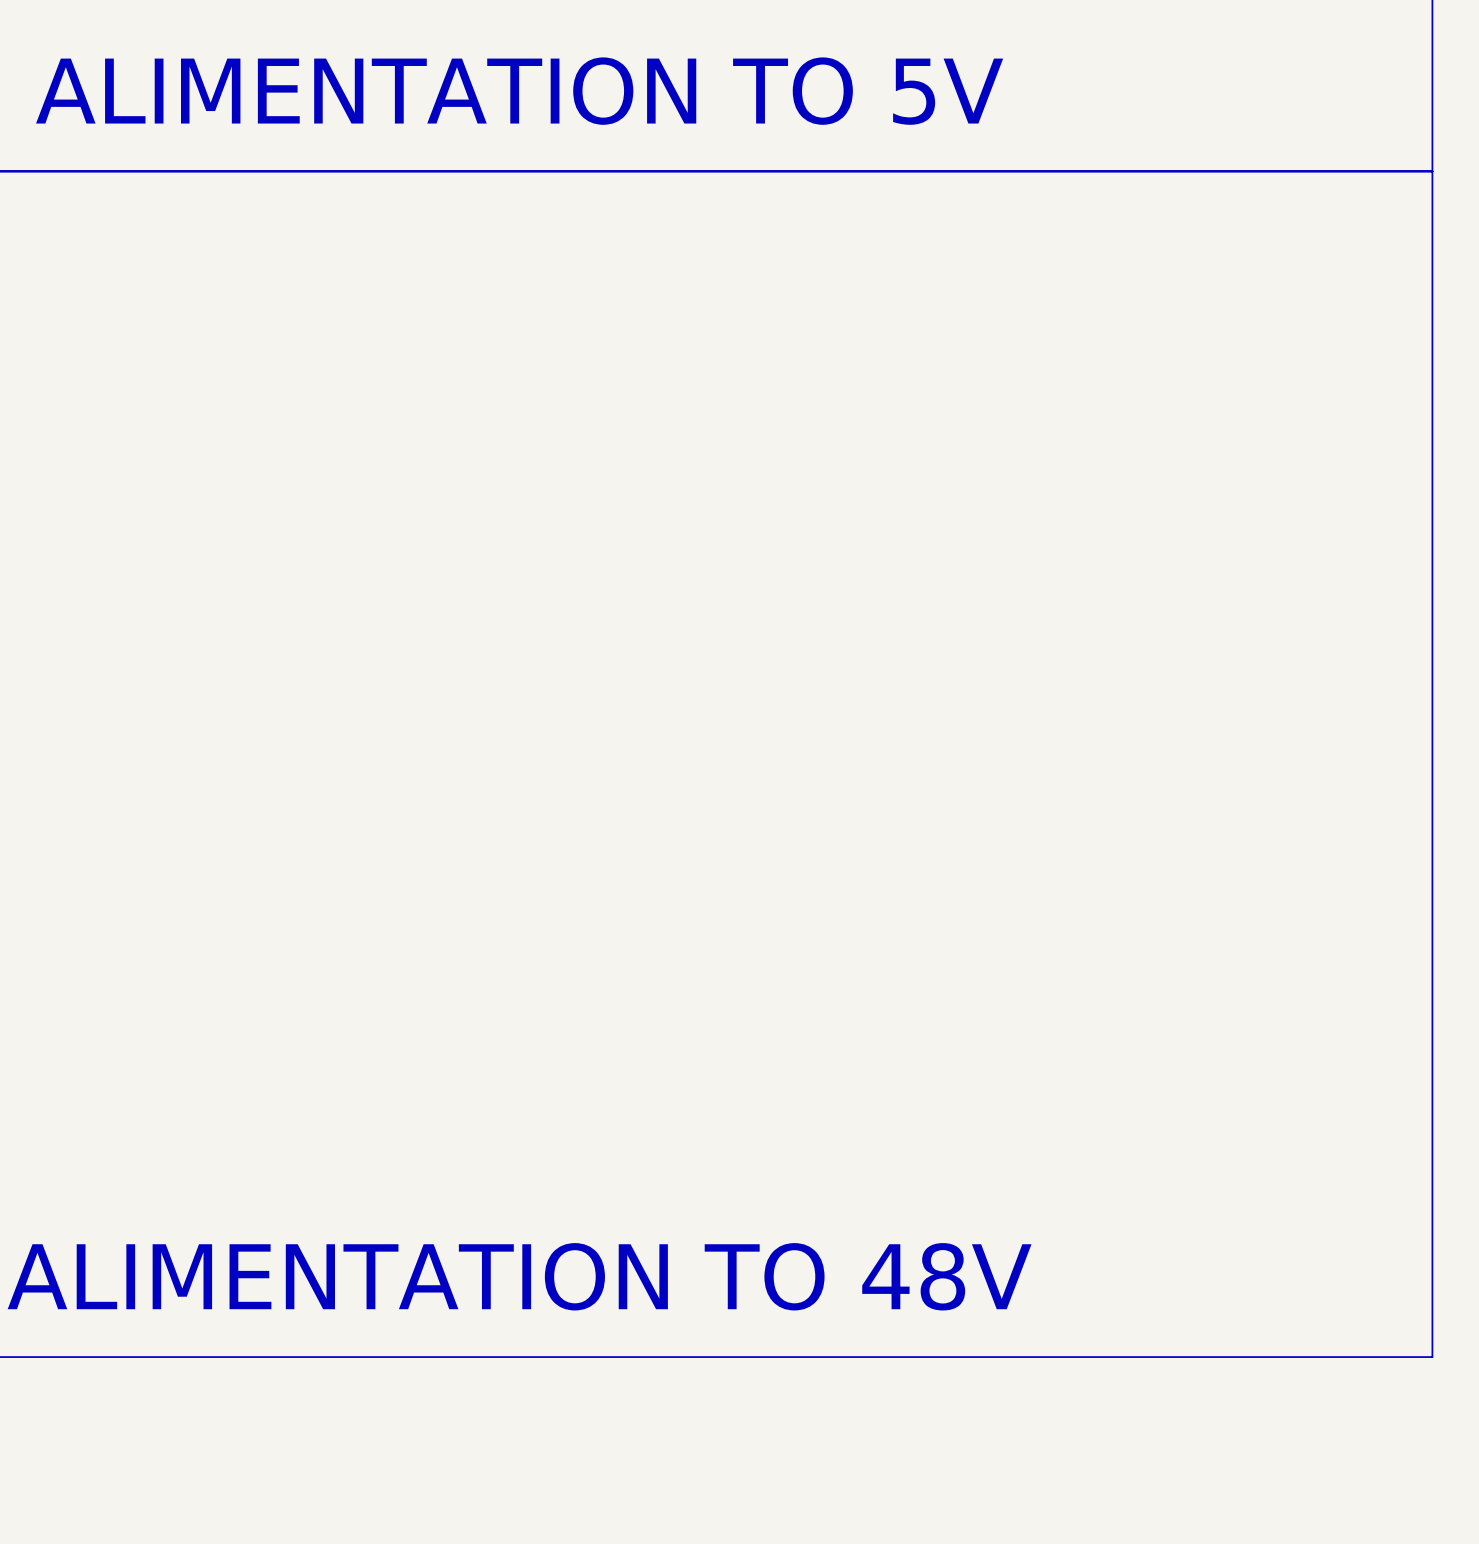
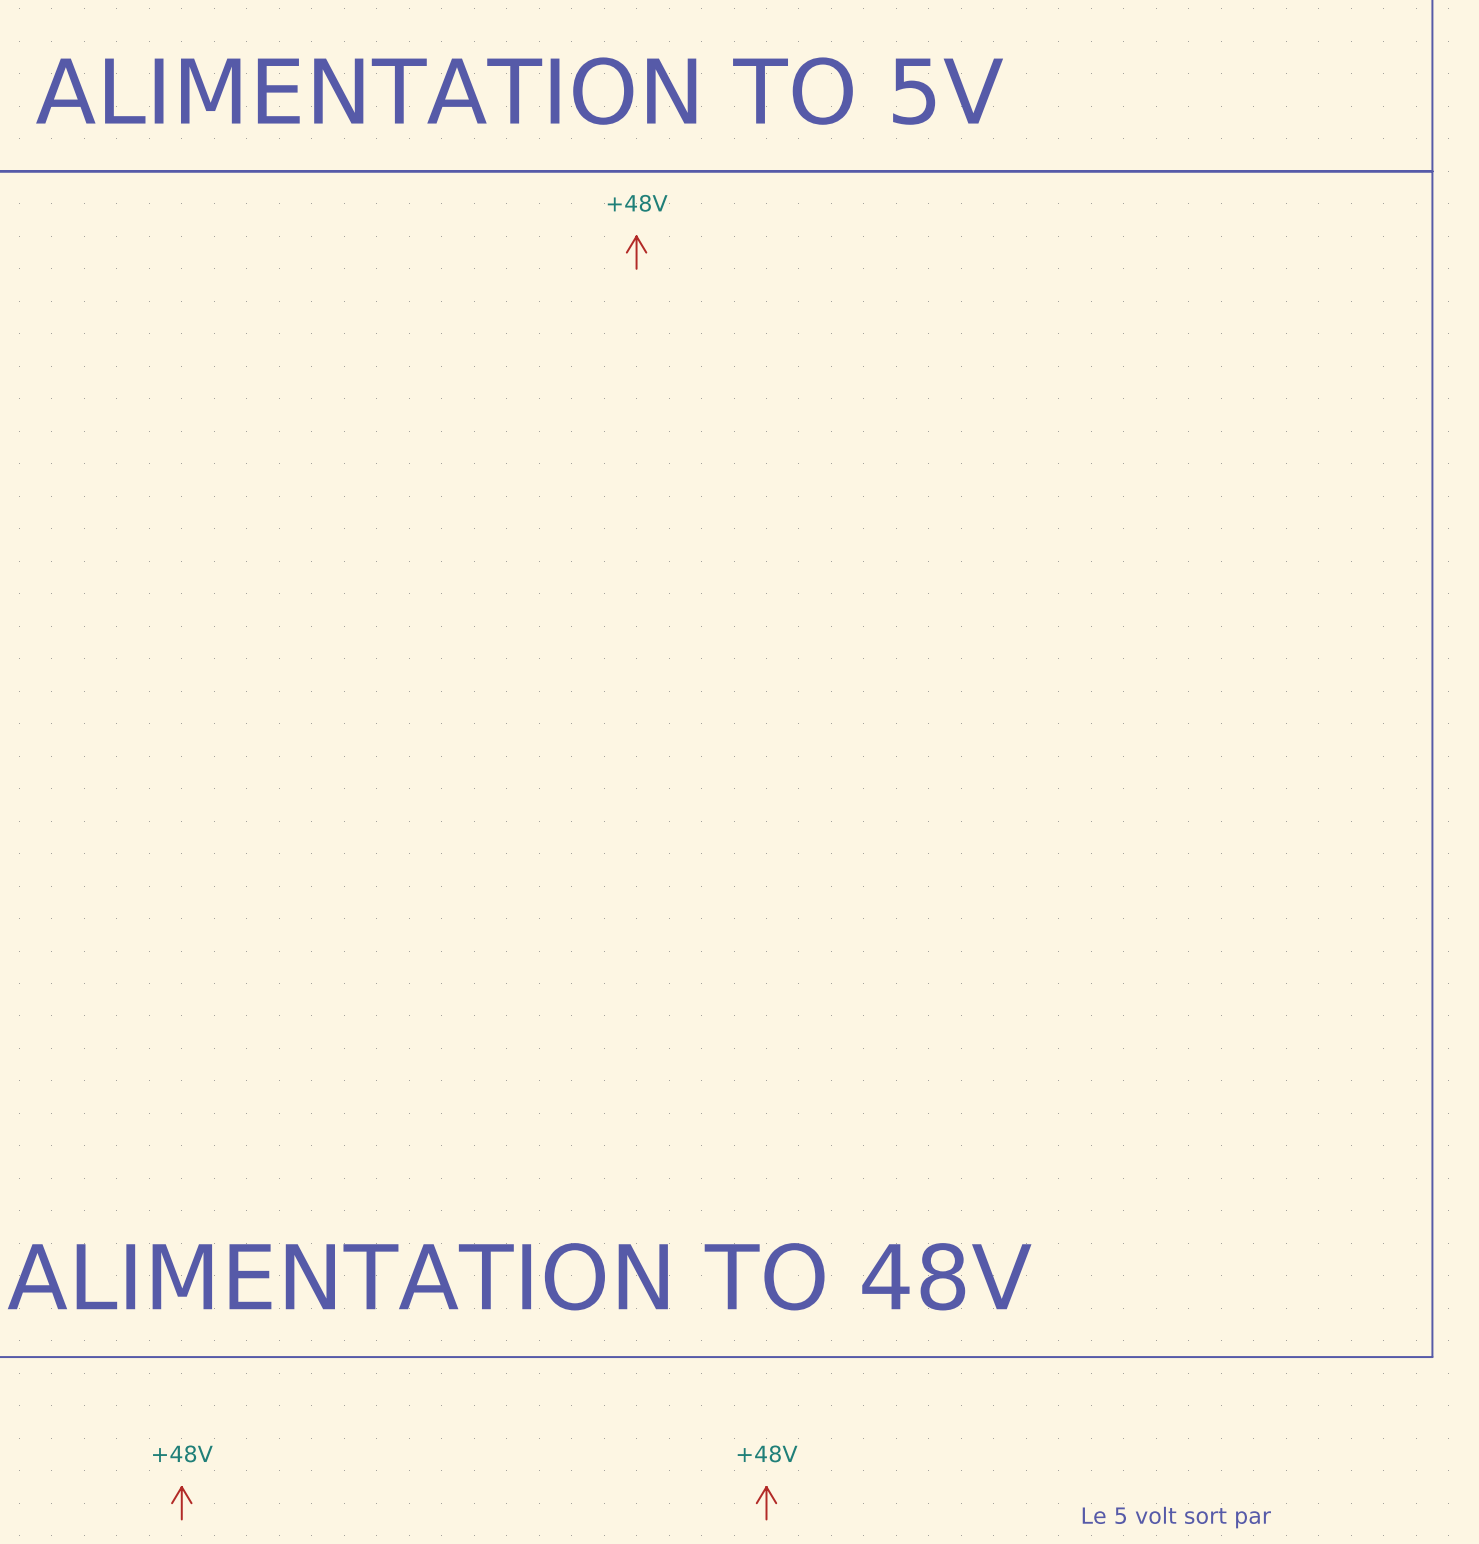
power symbol: none -> +48V (636, 252)
power symbol: none -> +48V (181, 1503)
power symbol: none -> +48V (766, 1503)
text: none -> Le 5 volt sort par (1176, 1517)

